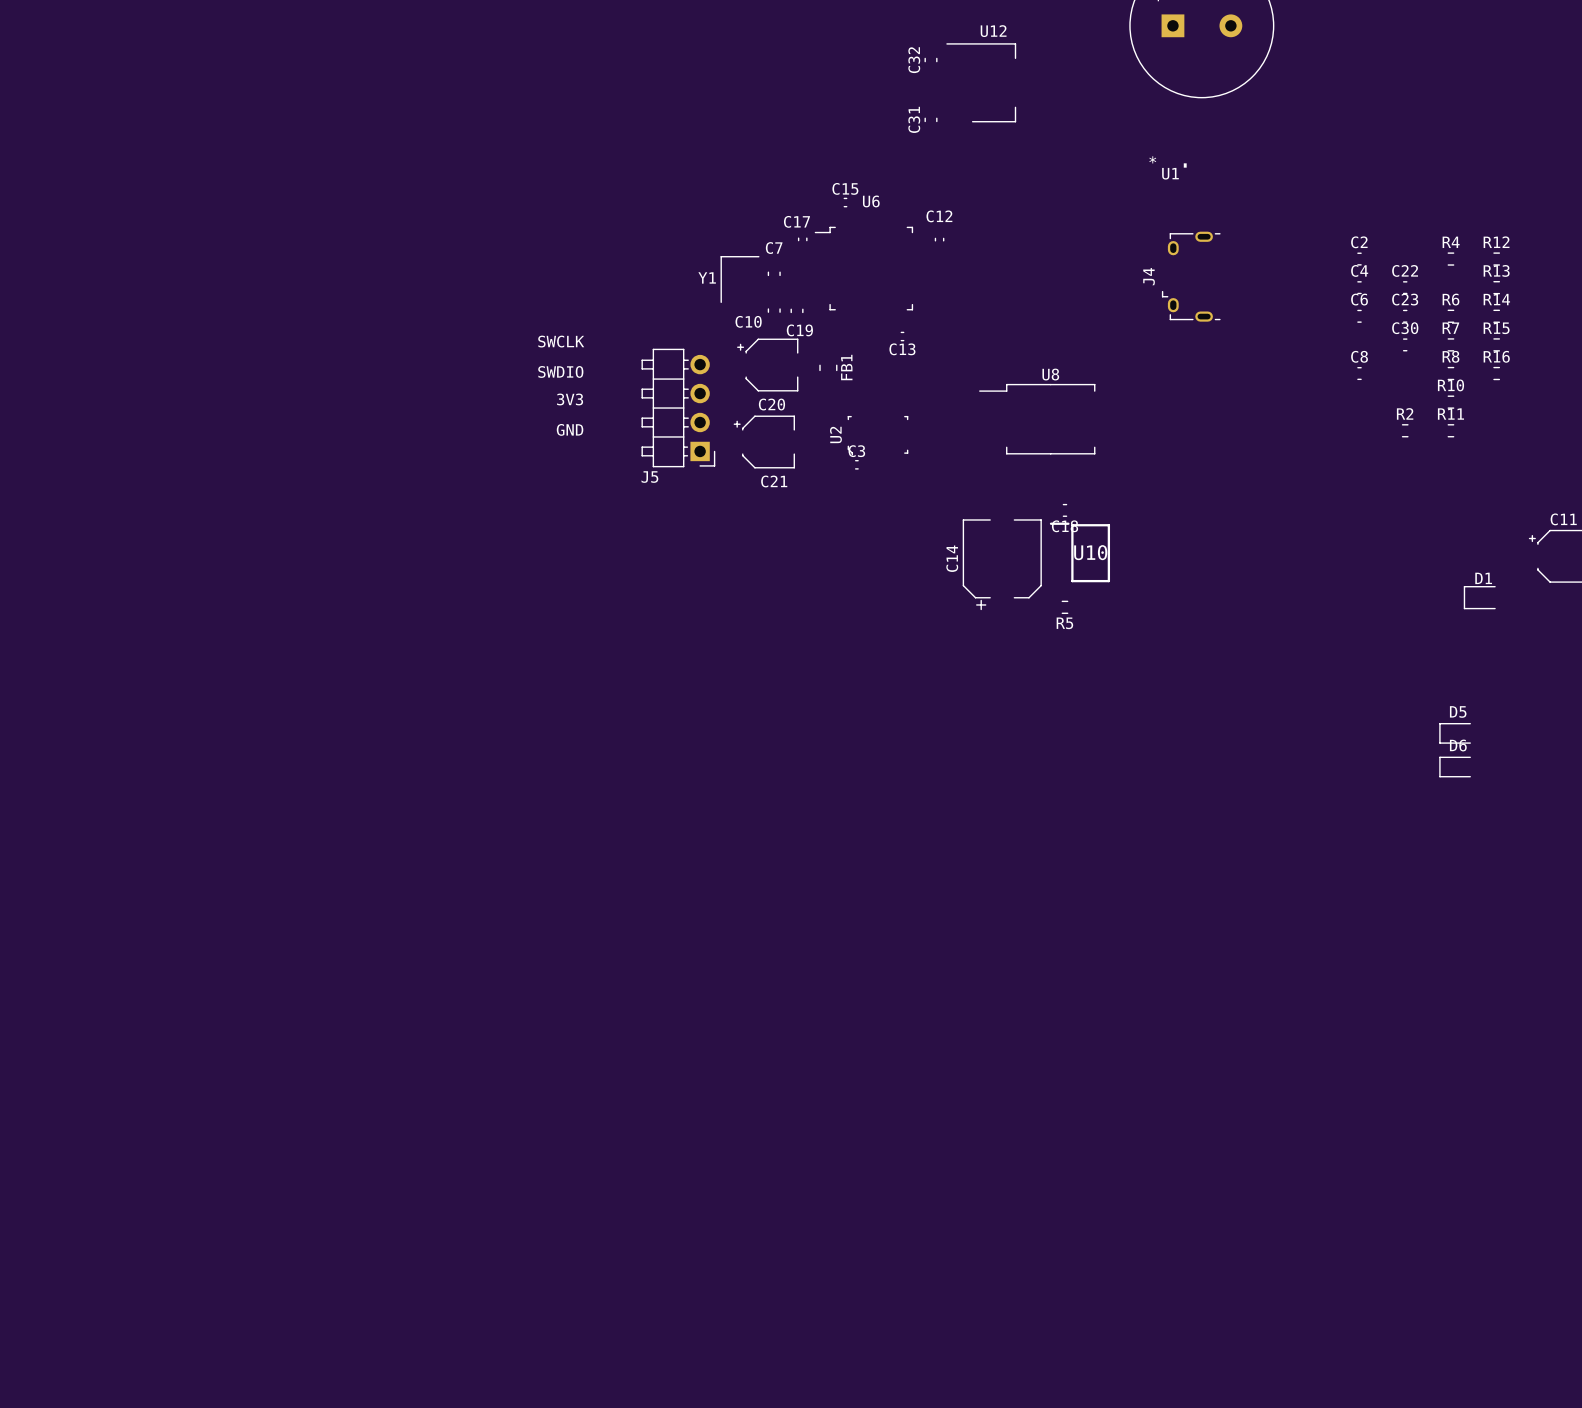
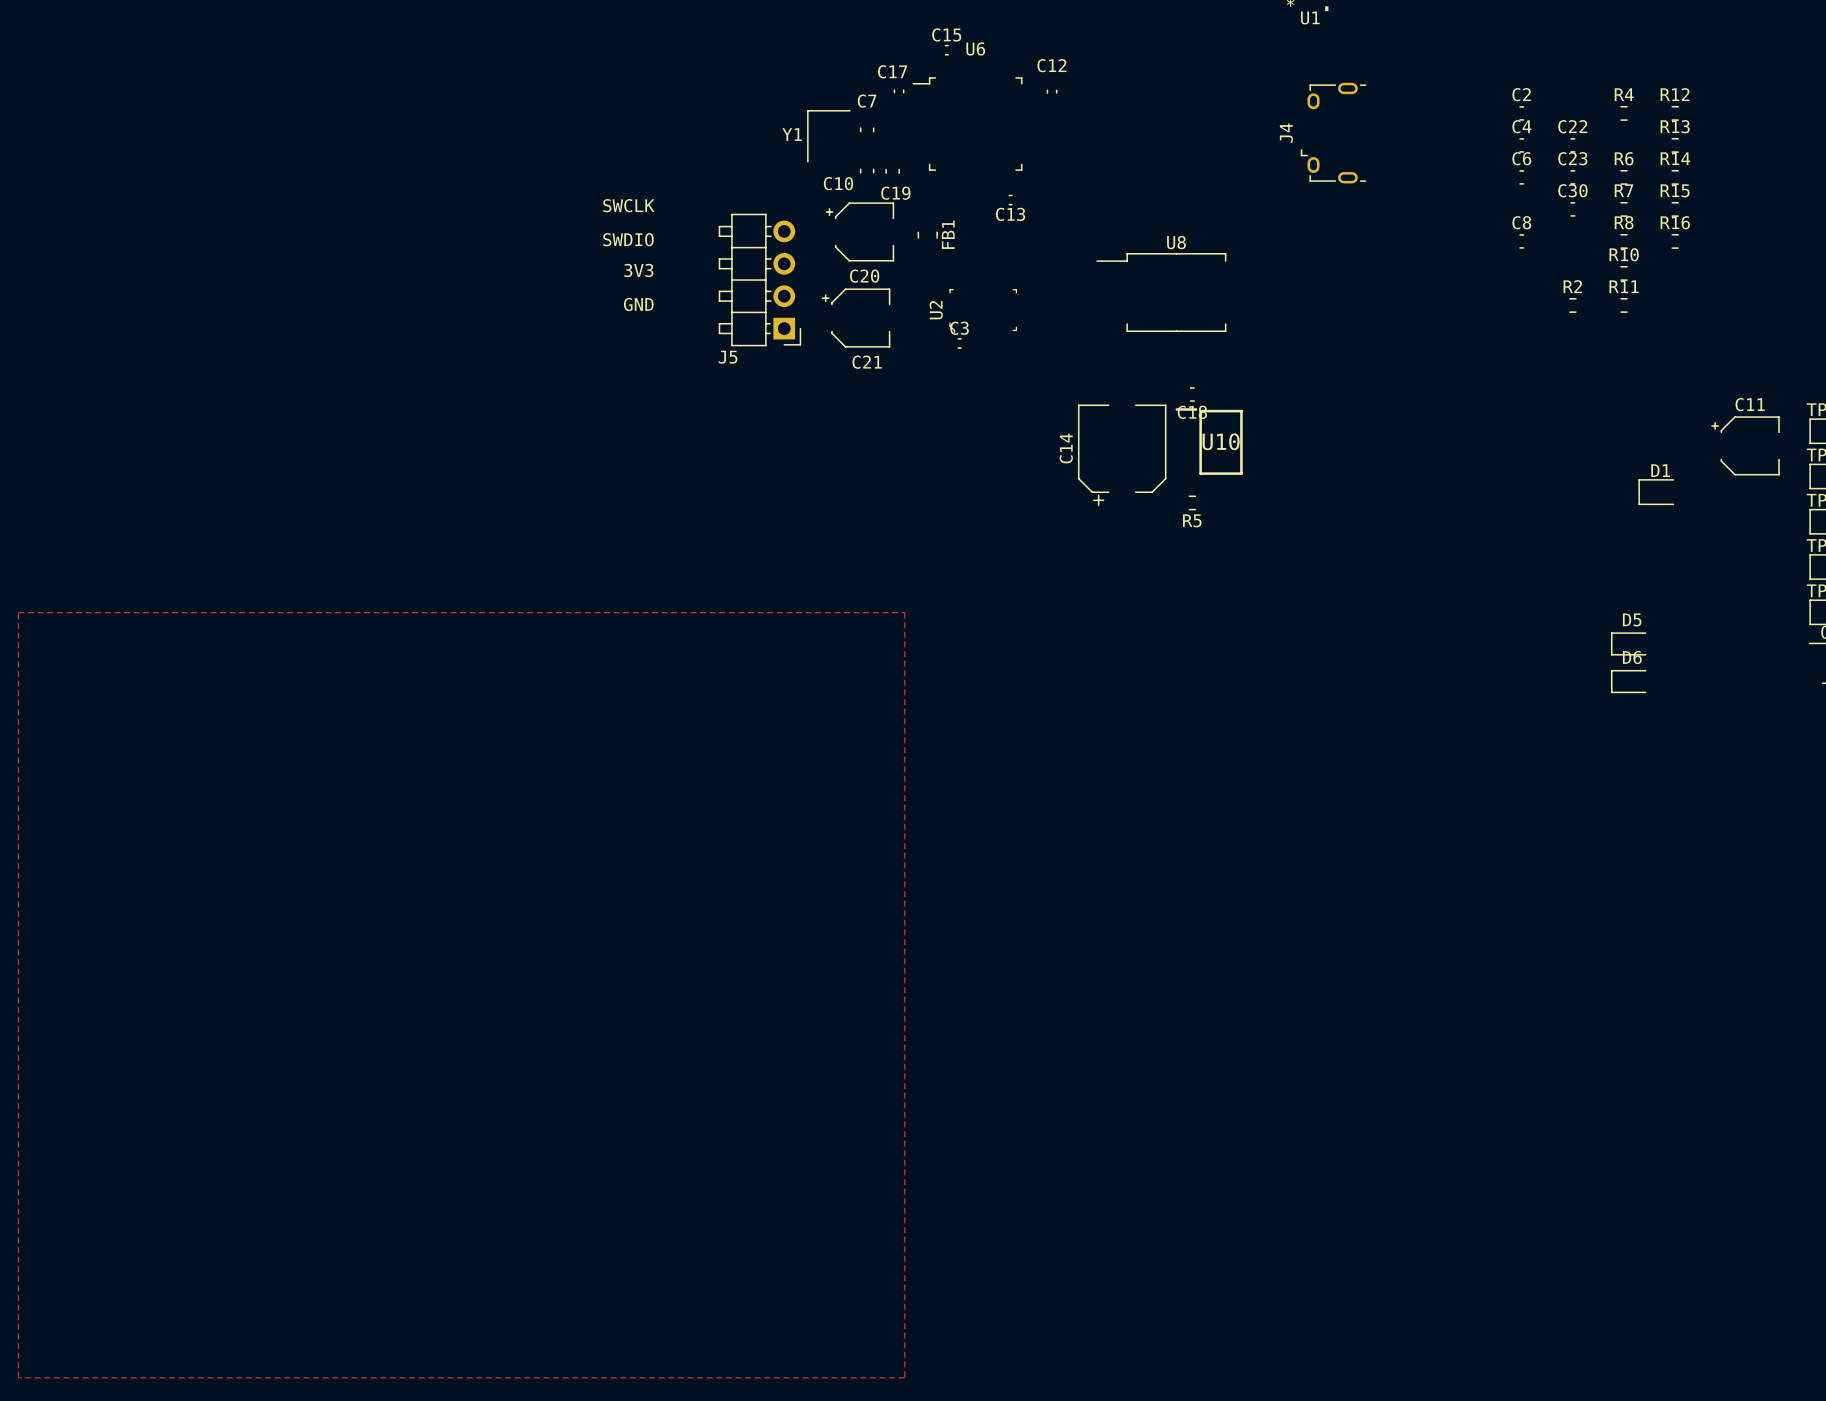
zone outline: none -> (18, 612) (904, 612) (904, 1377) (18, 1377) (18, 612)

